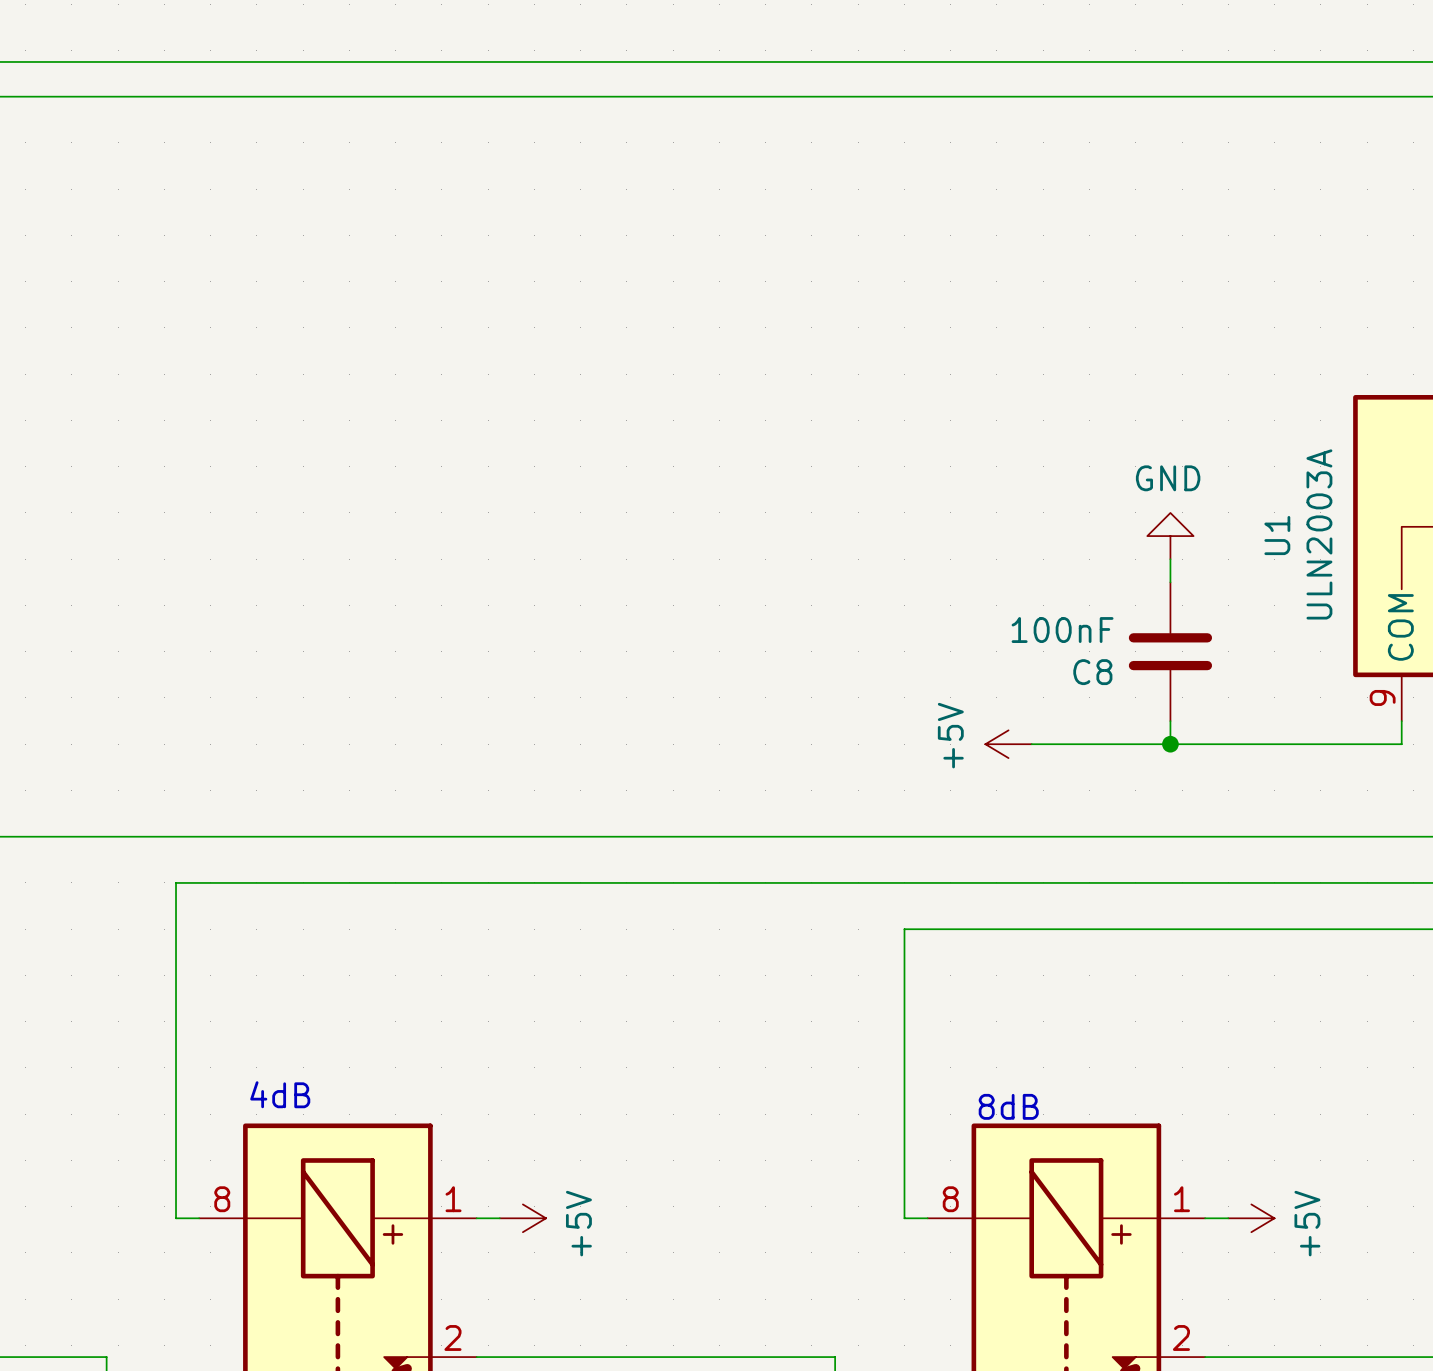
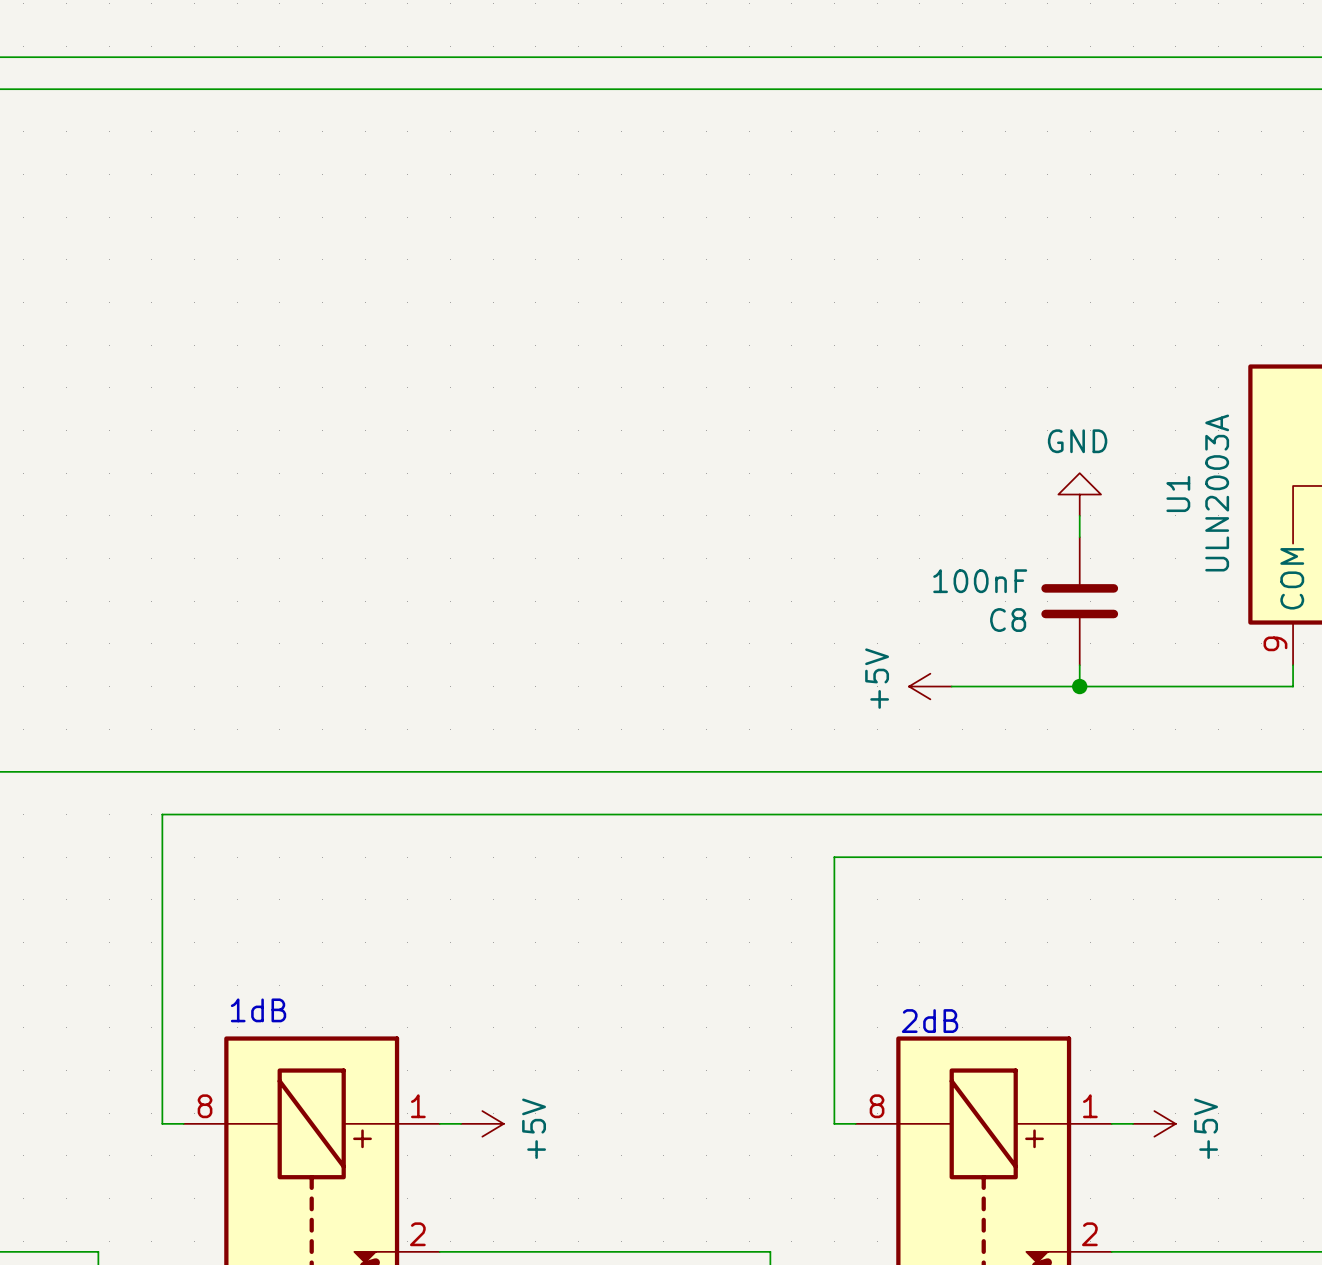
text: 4dB (280, 1094) -> 1dB (258, 1010)
text: 8dB (1008, 1106) -> 2dB (930, 1021)

